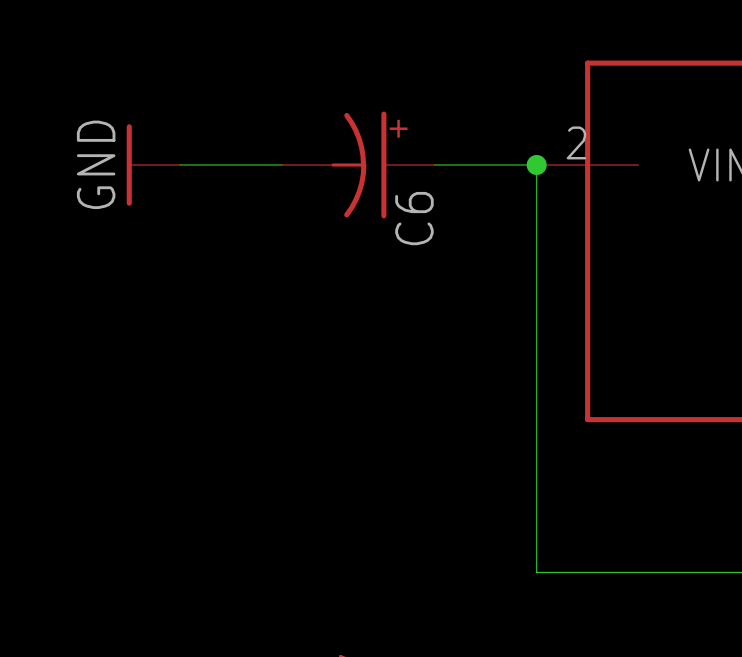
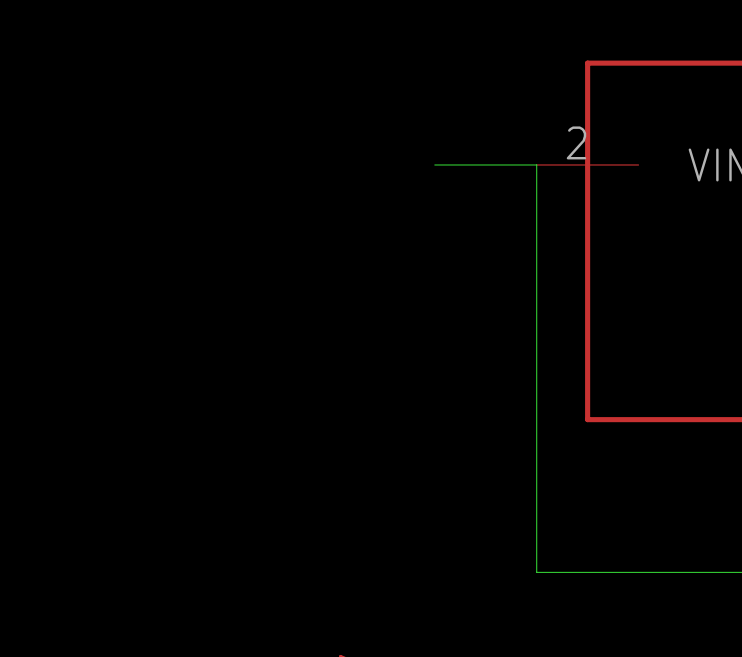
power symbol: GND (153, 164) -> none
wire: (180, 164) (282, 164) -> none
C6: (358, 164) -> none
junction: (536, 164) -> none

